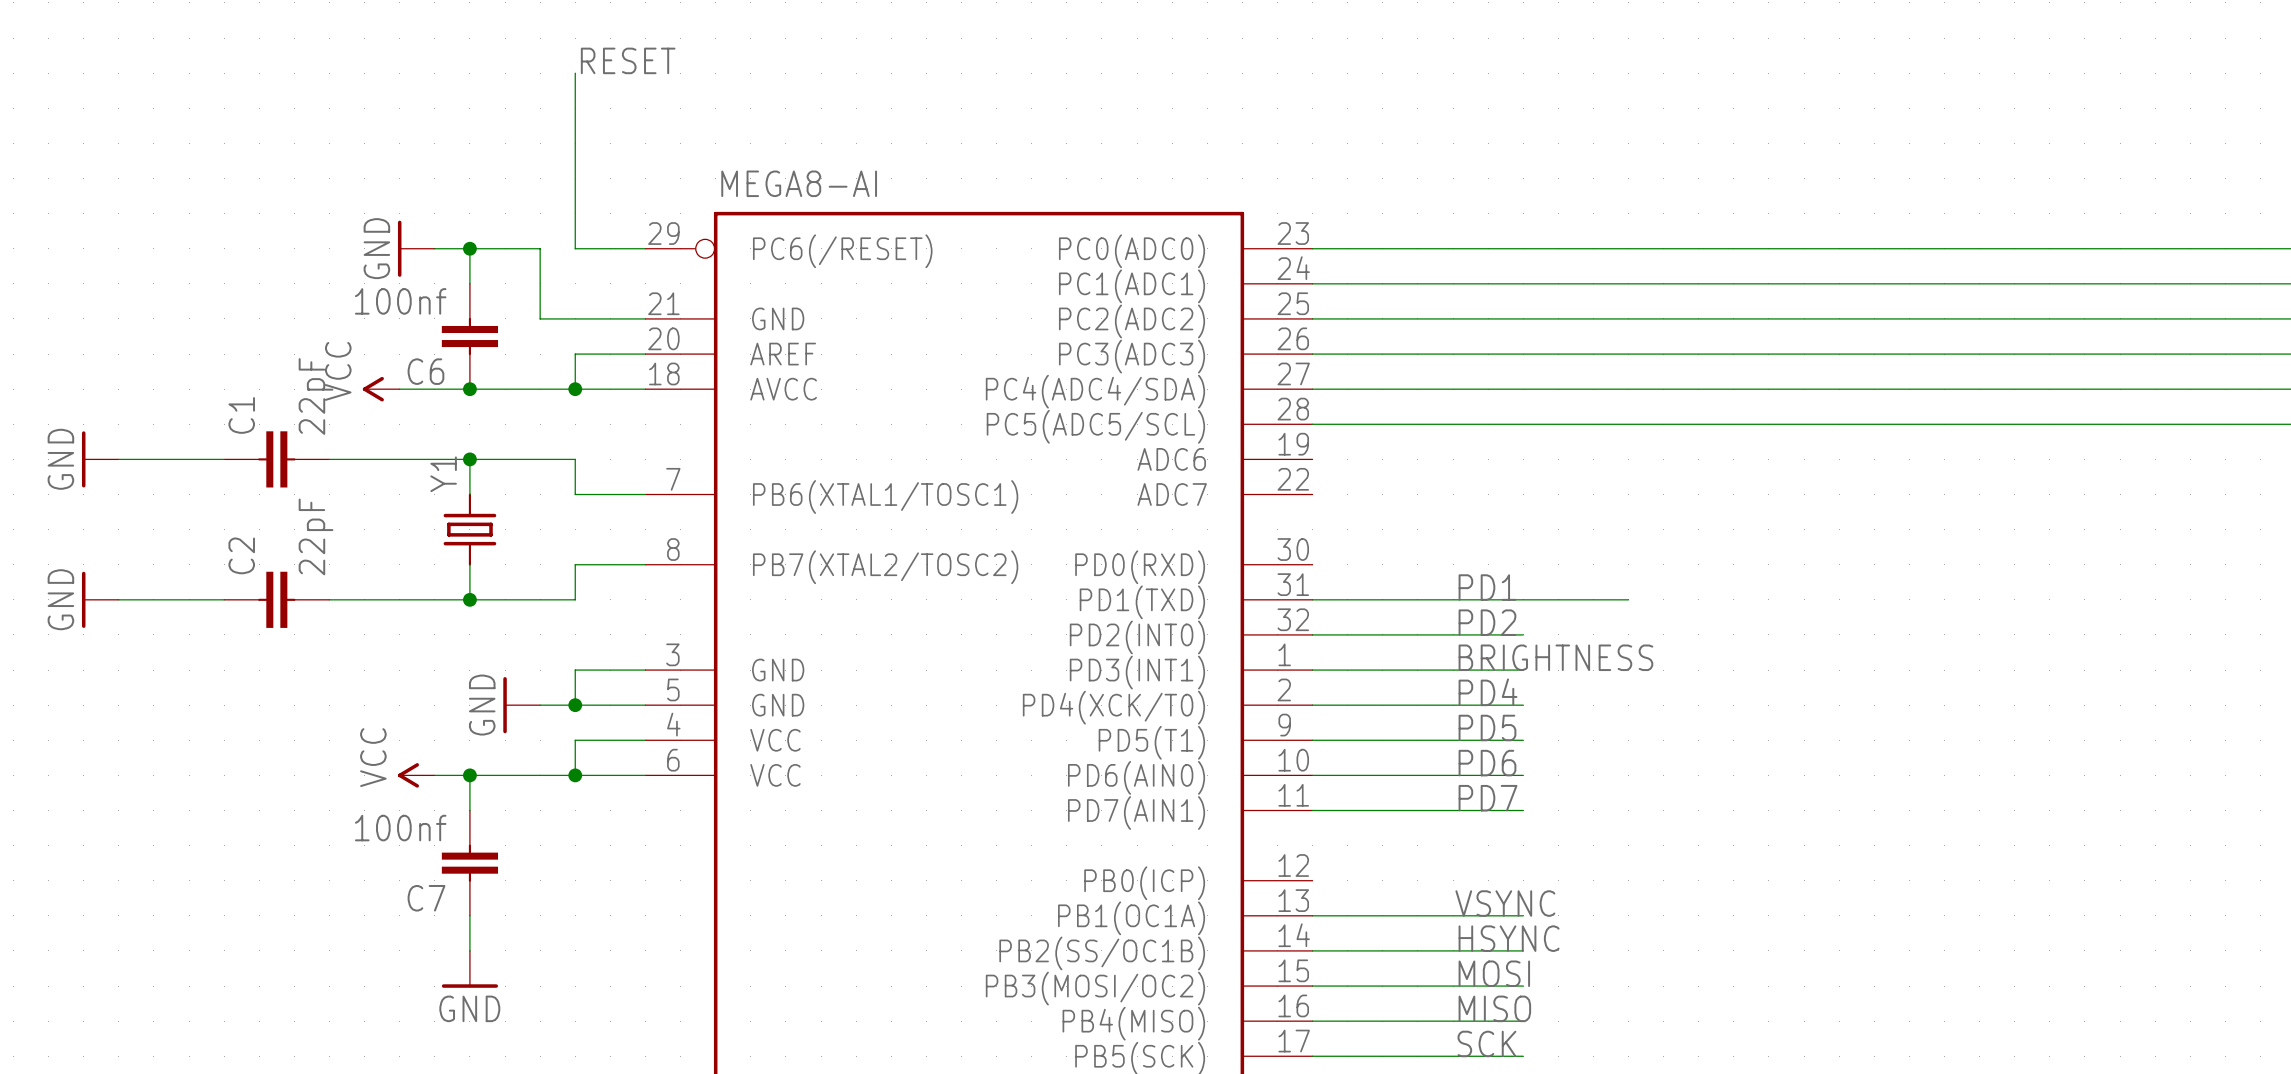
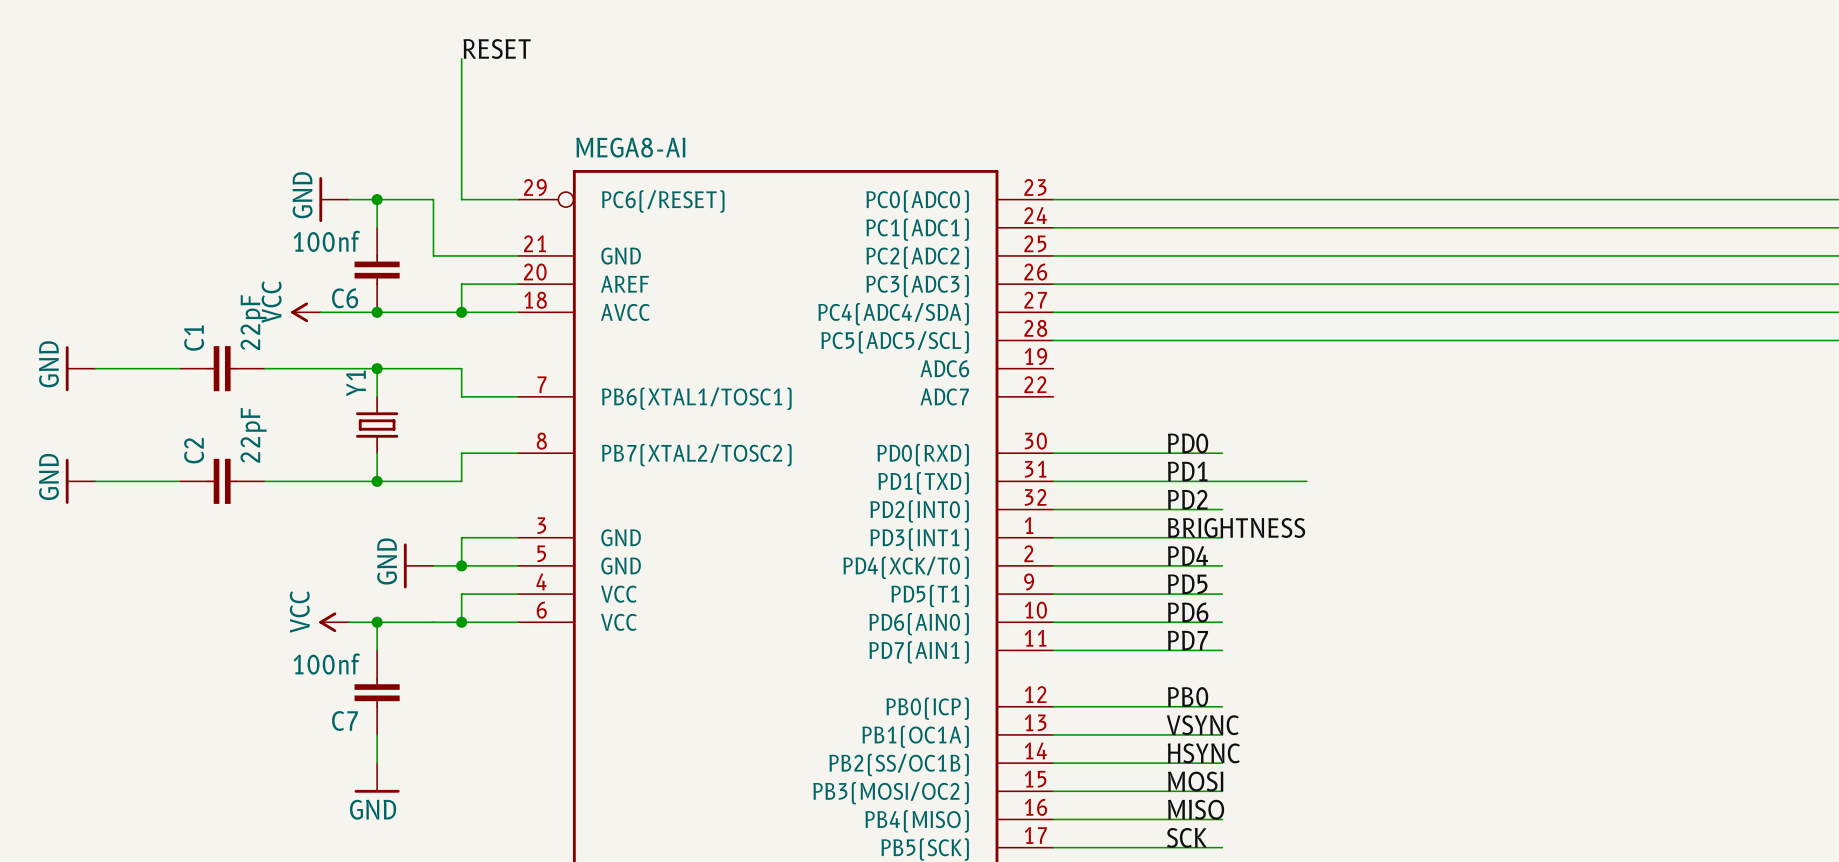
label: none -> PD0 (1188, 443)
wire: none -> (1053, 453) (1222, 453)
label: none -> PB0 (1188, 697)
wire: none -> (1053, 706) (1222, 706)

